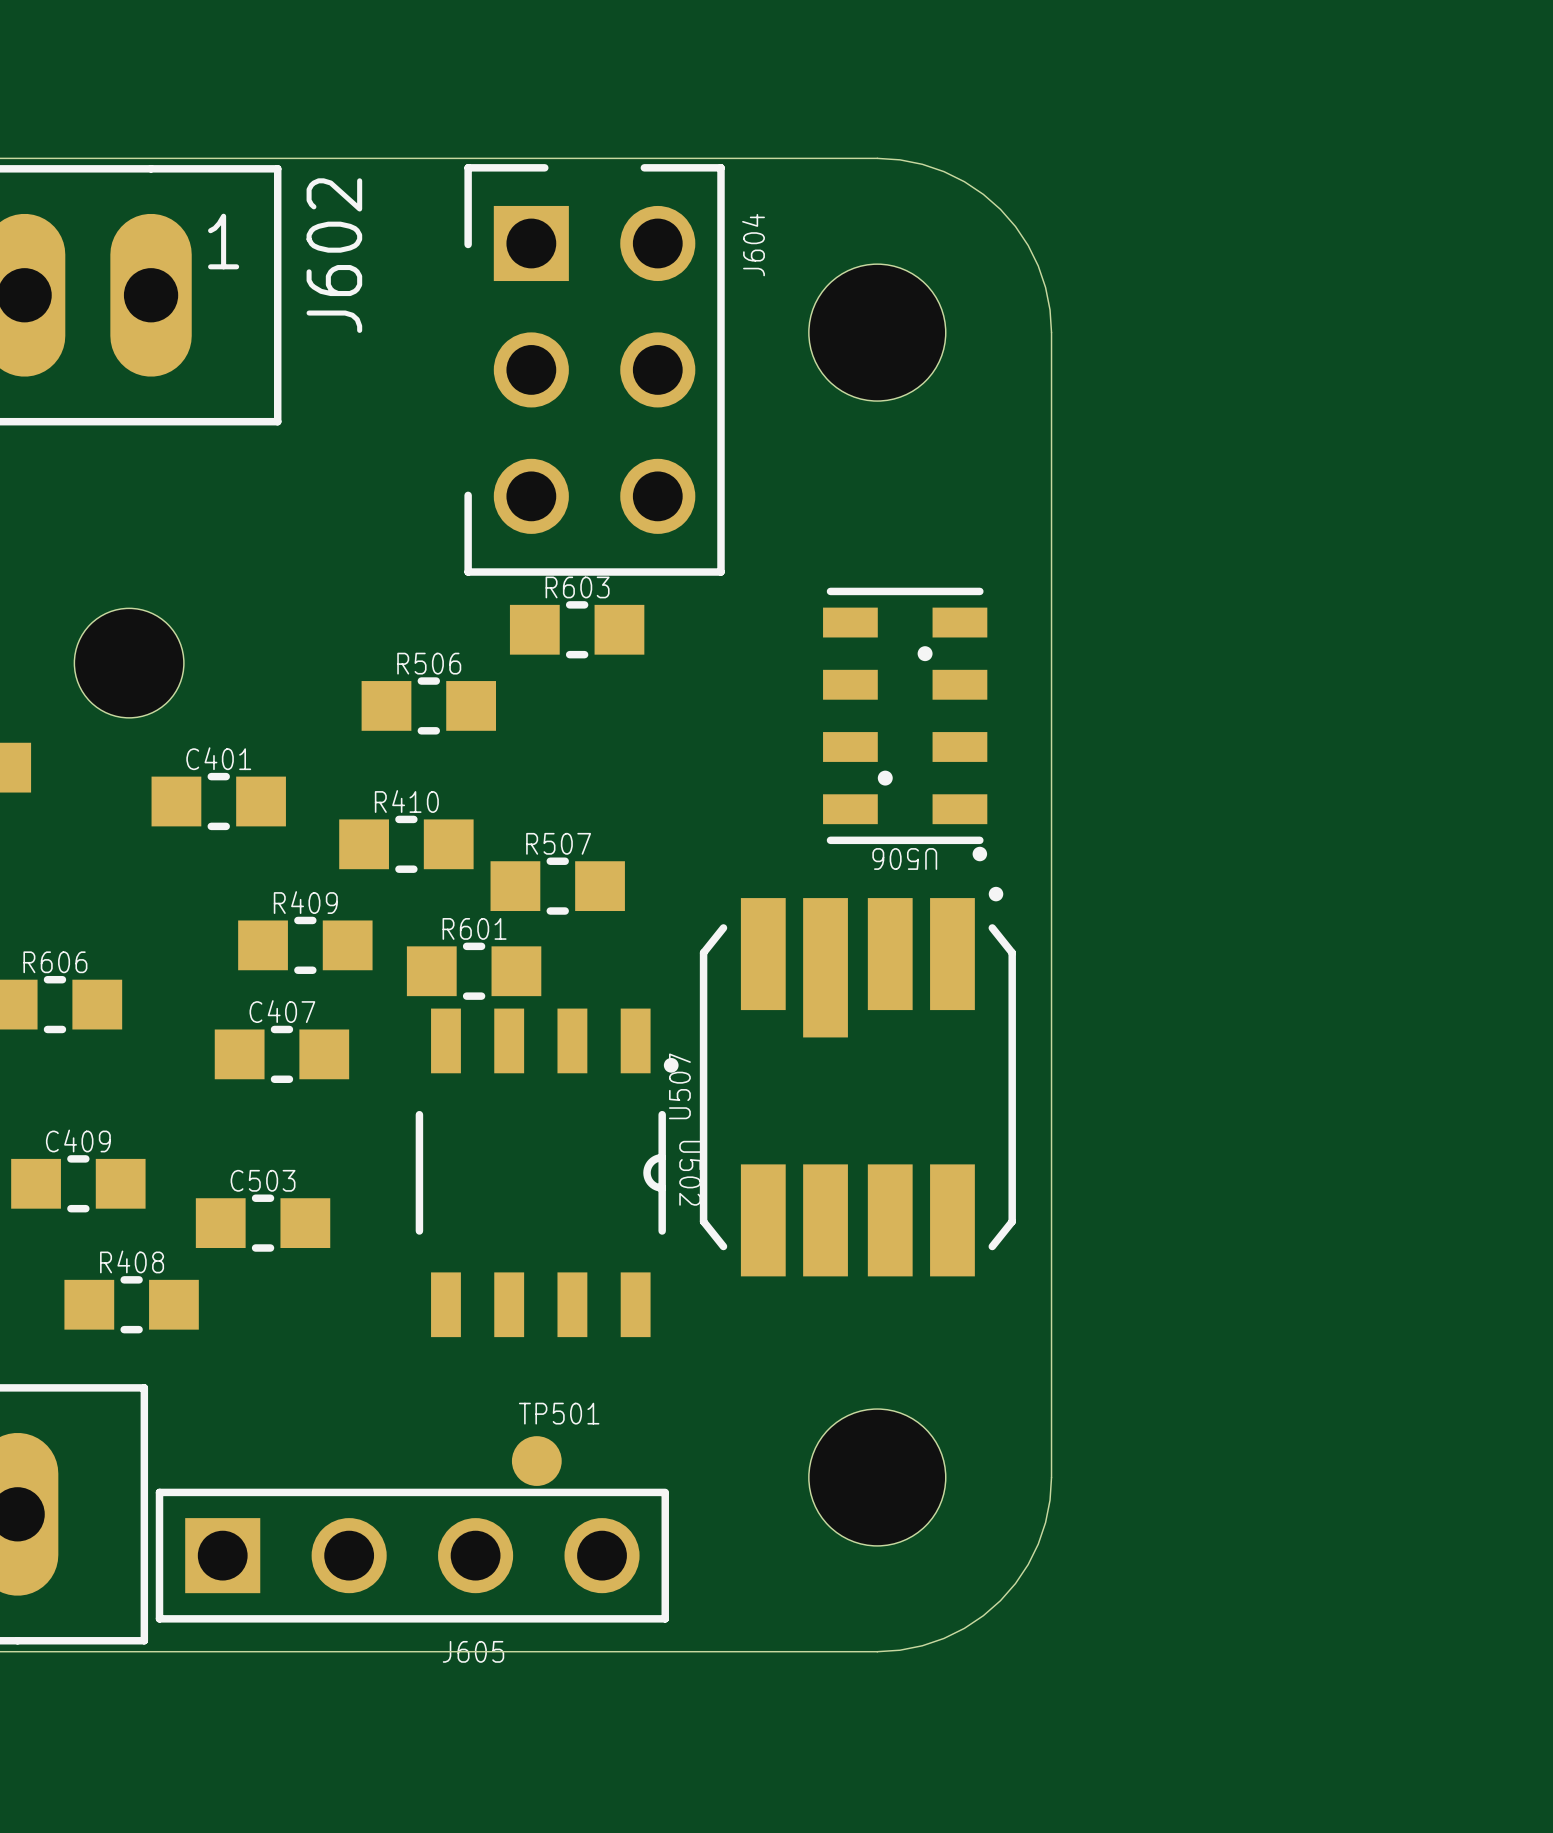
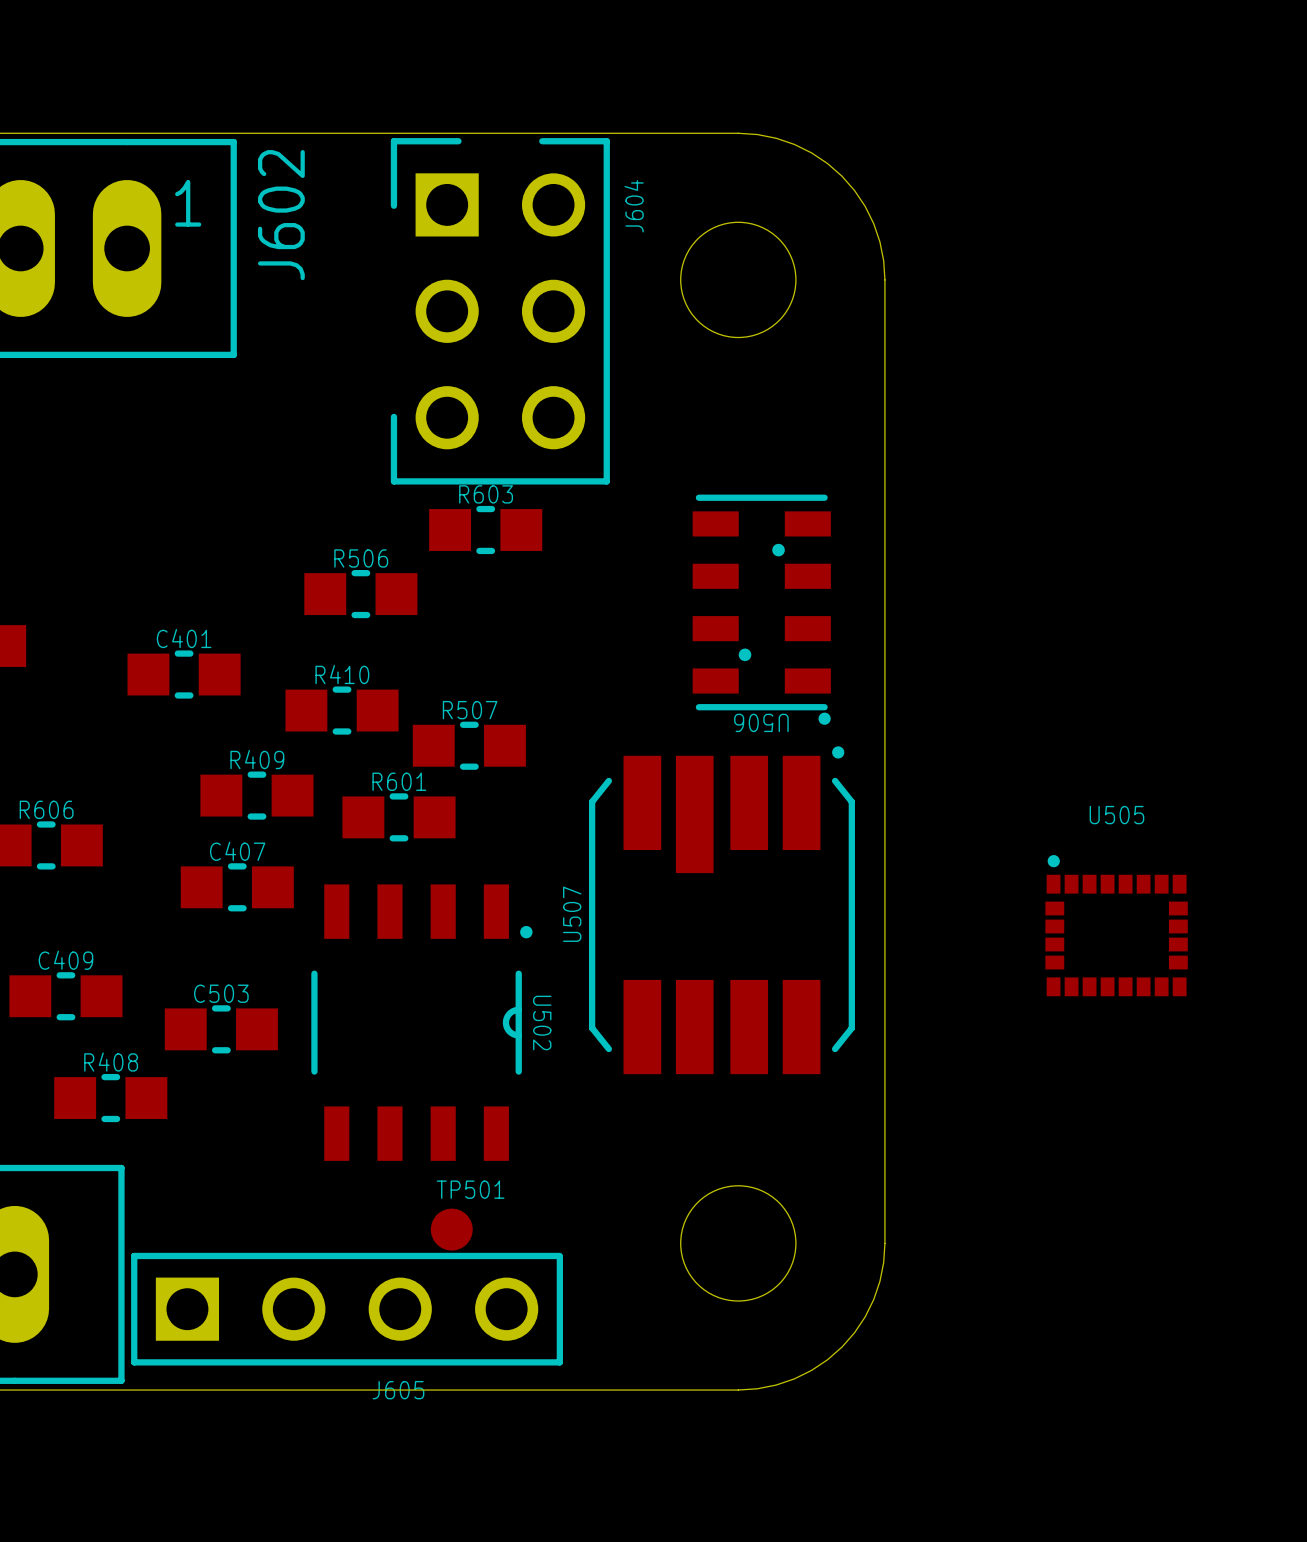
part: (129, 663) -> none
U505: none -> (1116, 925)
U502 position: (547, 1172) -> (421, 1022)

